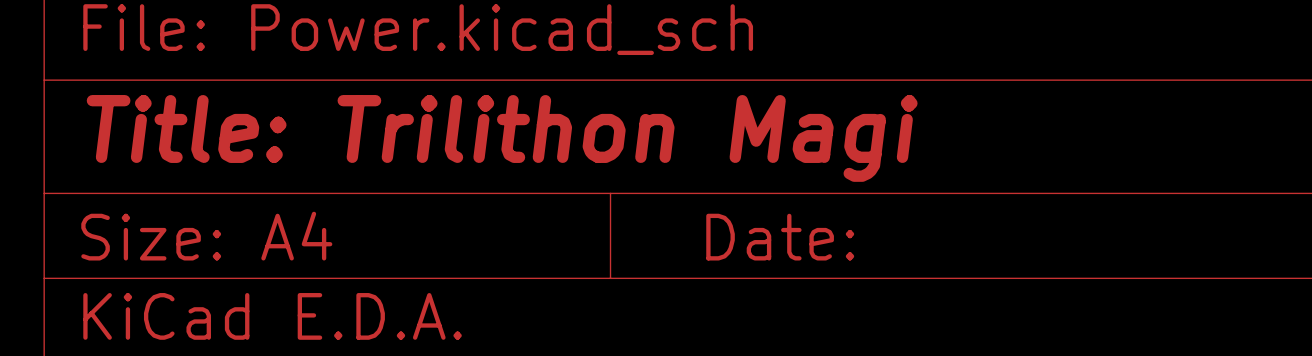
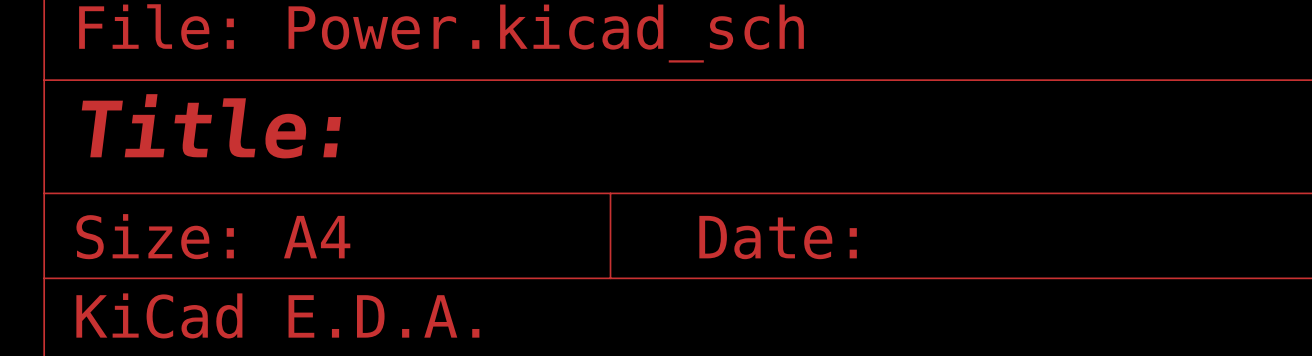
title block: Title: Trilithon Magi (502, 138) -> Title: (211, 126)

